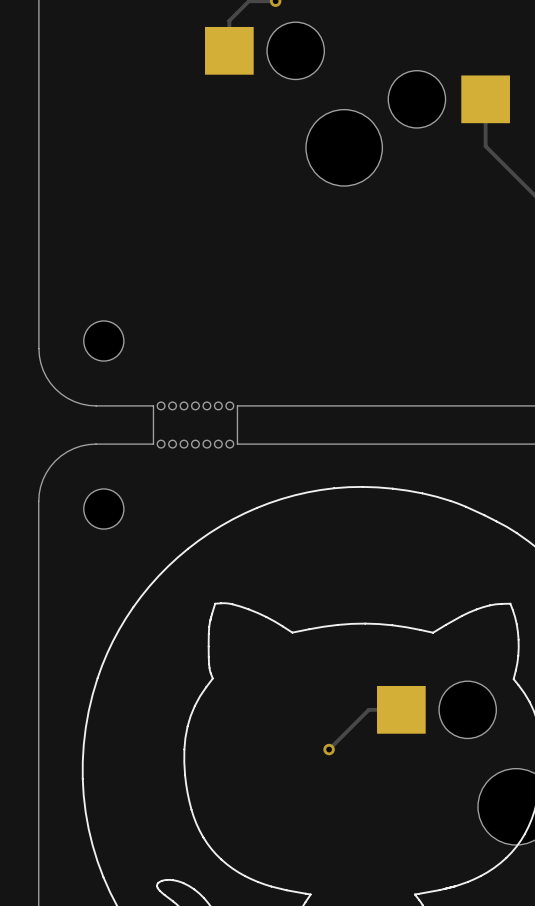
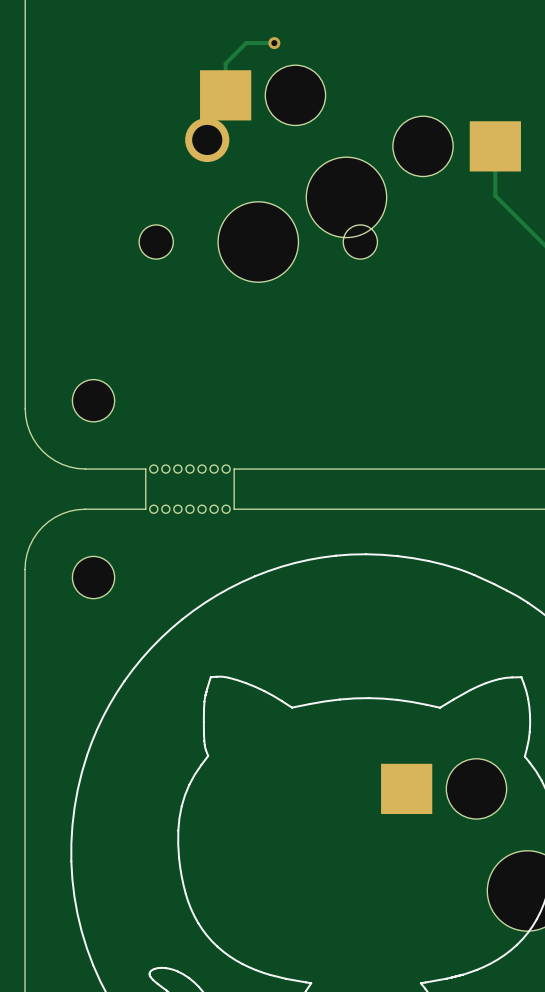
part: none -> (258, 200)
track: (401, 709) (368, 709) (329, 749) -> none
via: (329, 749) -> none

